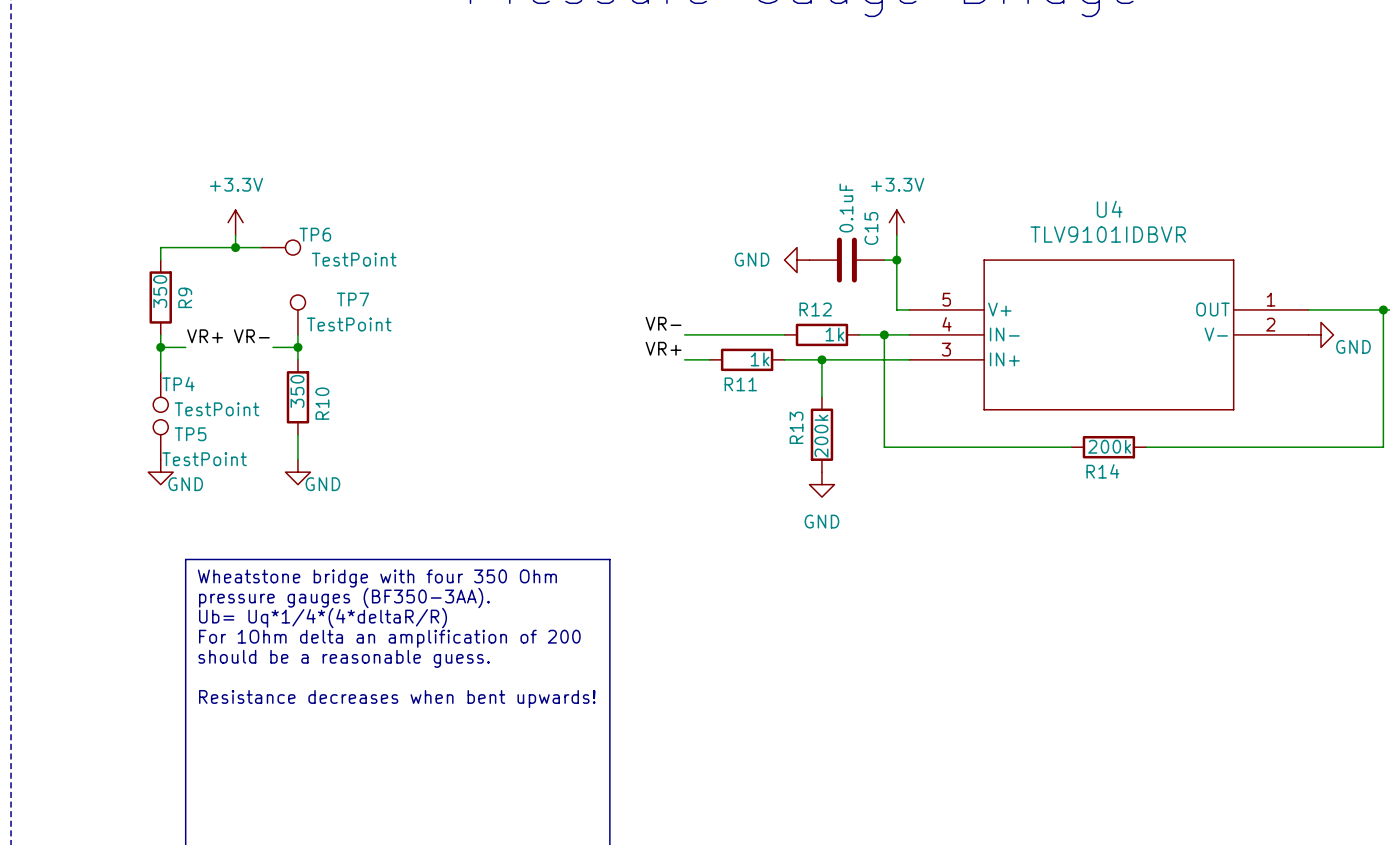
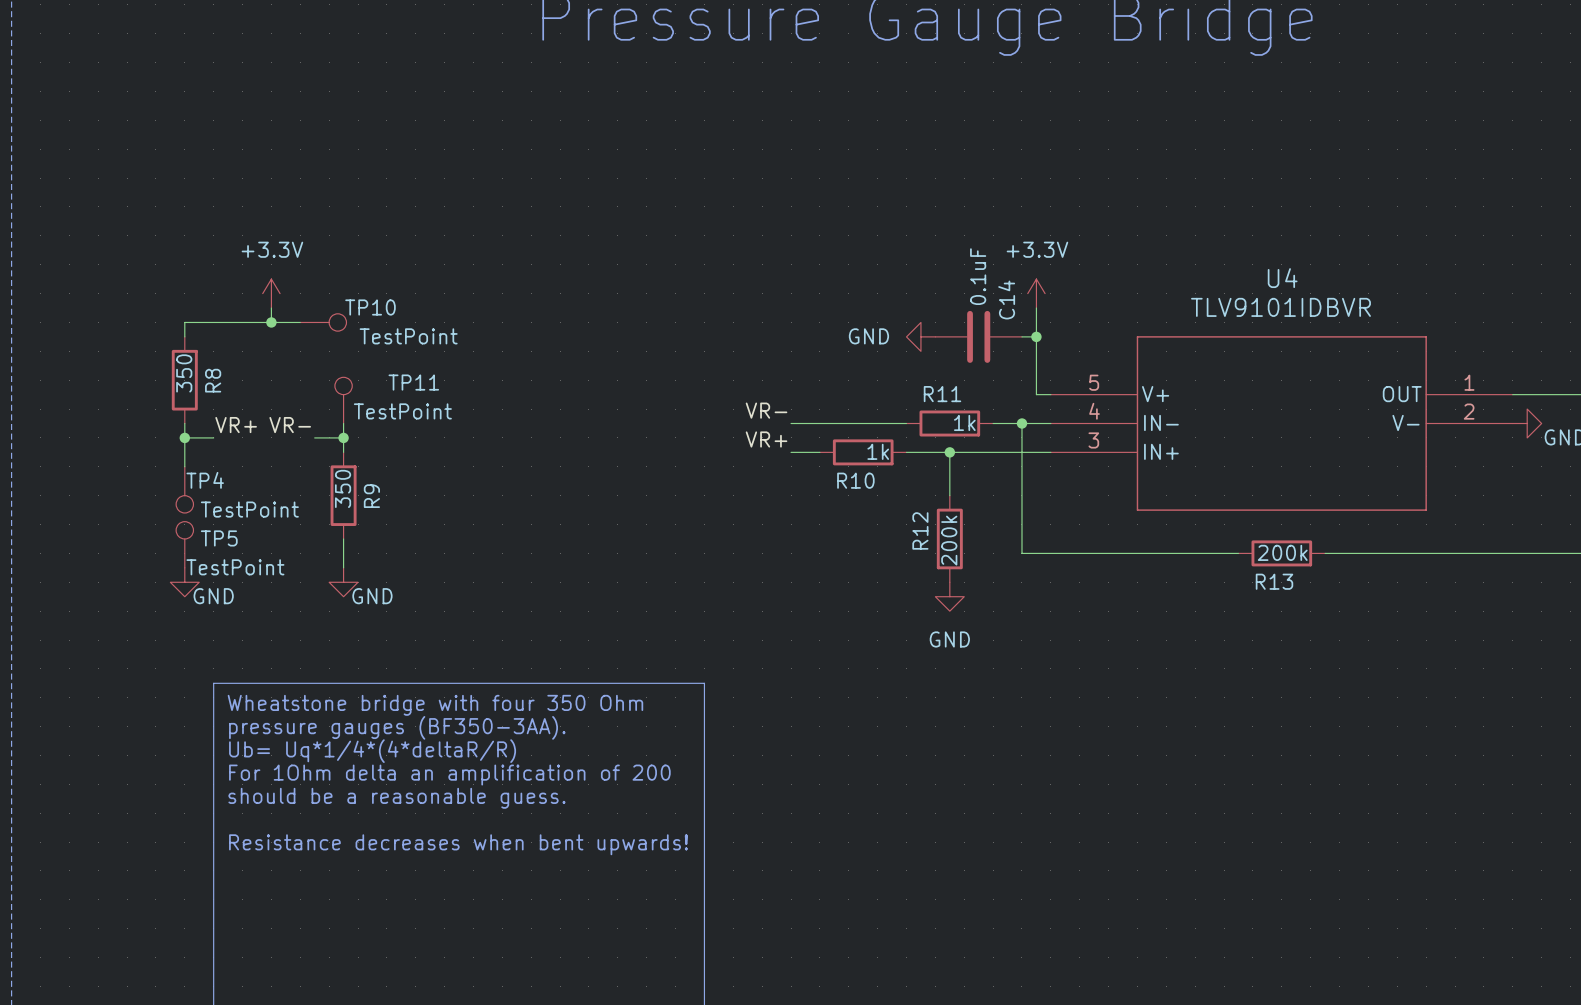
C15 name: C15 (871, 228) -> C14 (1006, 300)
TP6 name: TP6 (315, 234) -> TP10 (370, 307)
R9 name: R9 (185, 297) -> R8 (213, 380)
TP7 name: TP7 (353, 299) -> TP11 (413, 382)
R12 name: R12 (815, 309) -> R11 (942, 394)
R11 name: R11 (740, 384) -> R10 (855, 480)
R10 name: R10 (322, 403) -> R9 (371, 496)
R13 name: R13 (796, 427) -> R12 (920, 530)
R14 name: R14 (1102, 471) -> R13 (1274, 581)

